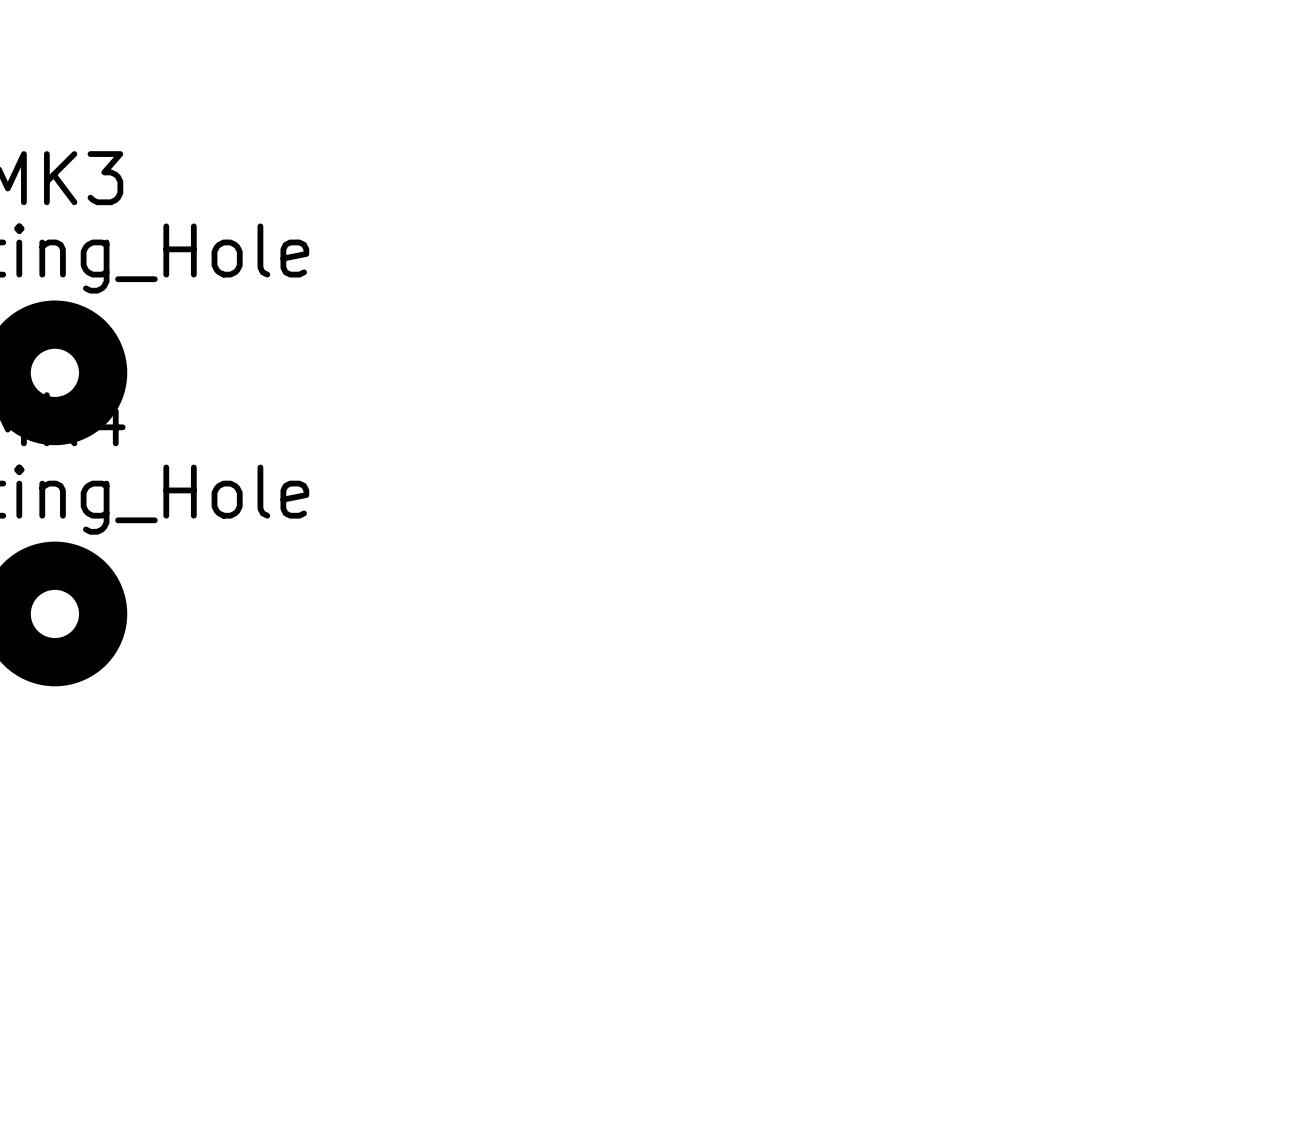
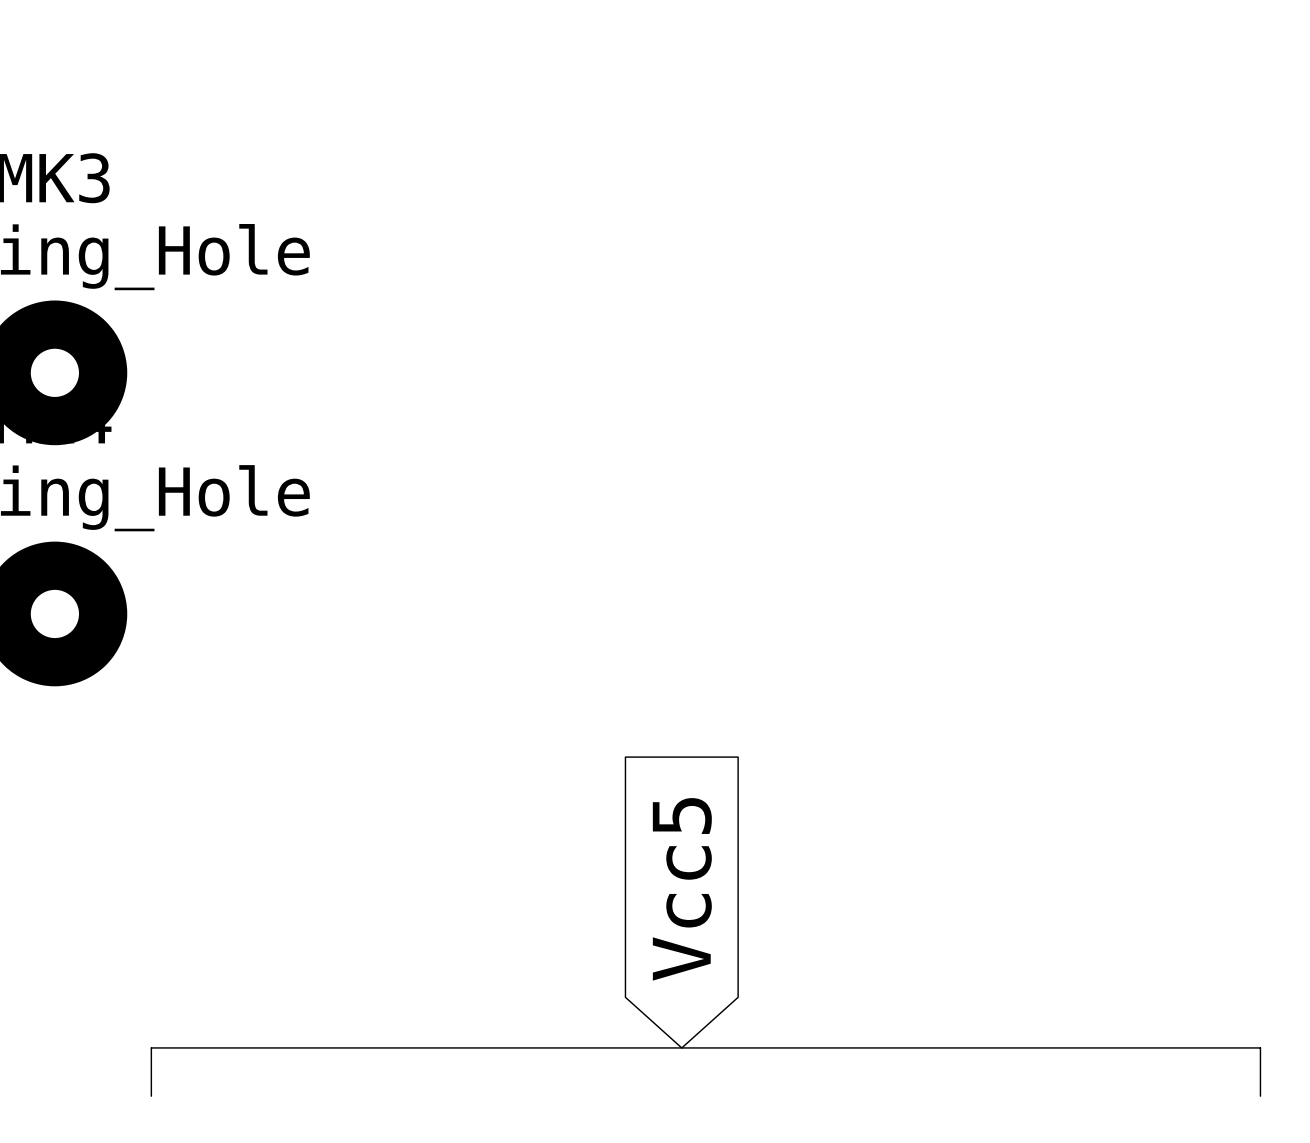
global label: none -> Vcc5 (682, 889)
wire: none -> (151, 1096) (151, 1047) (1260, 1047) (1260, 1096)

